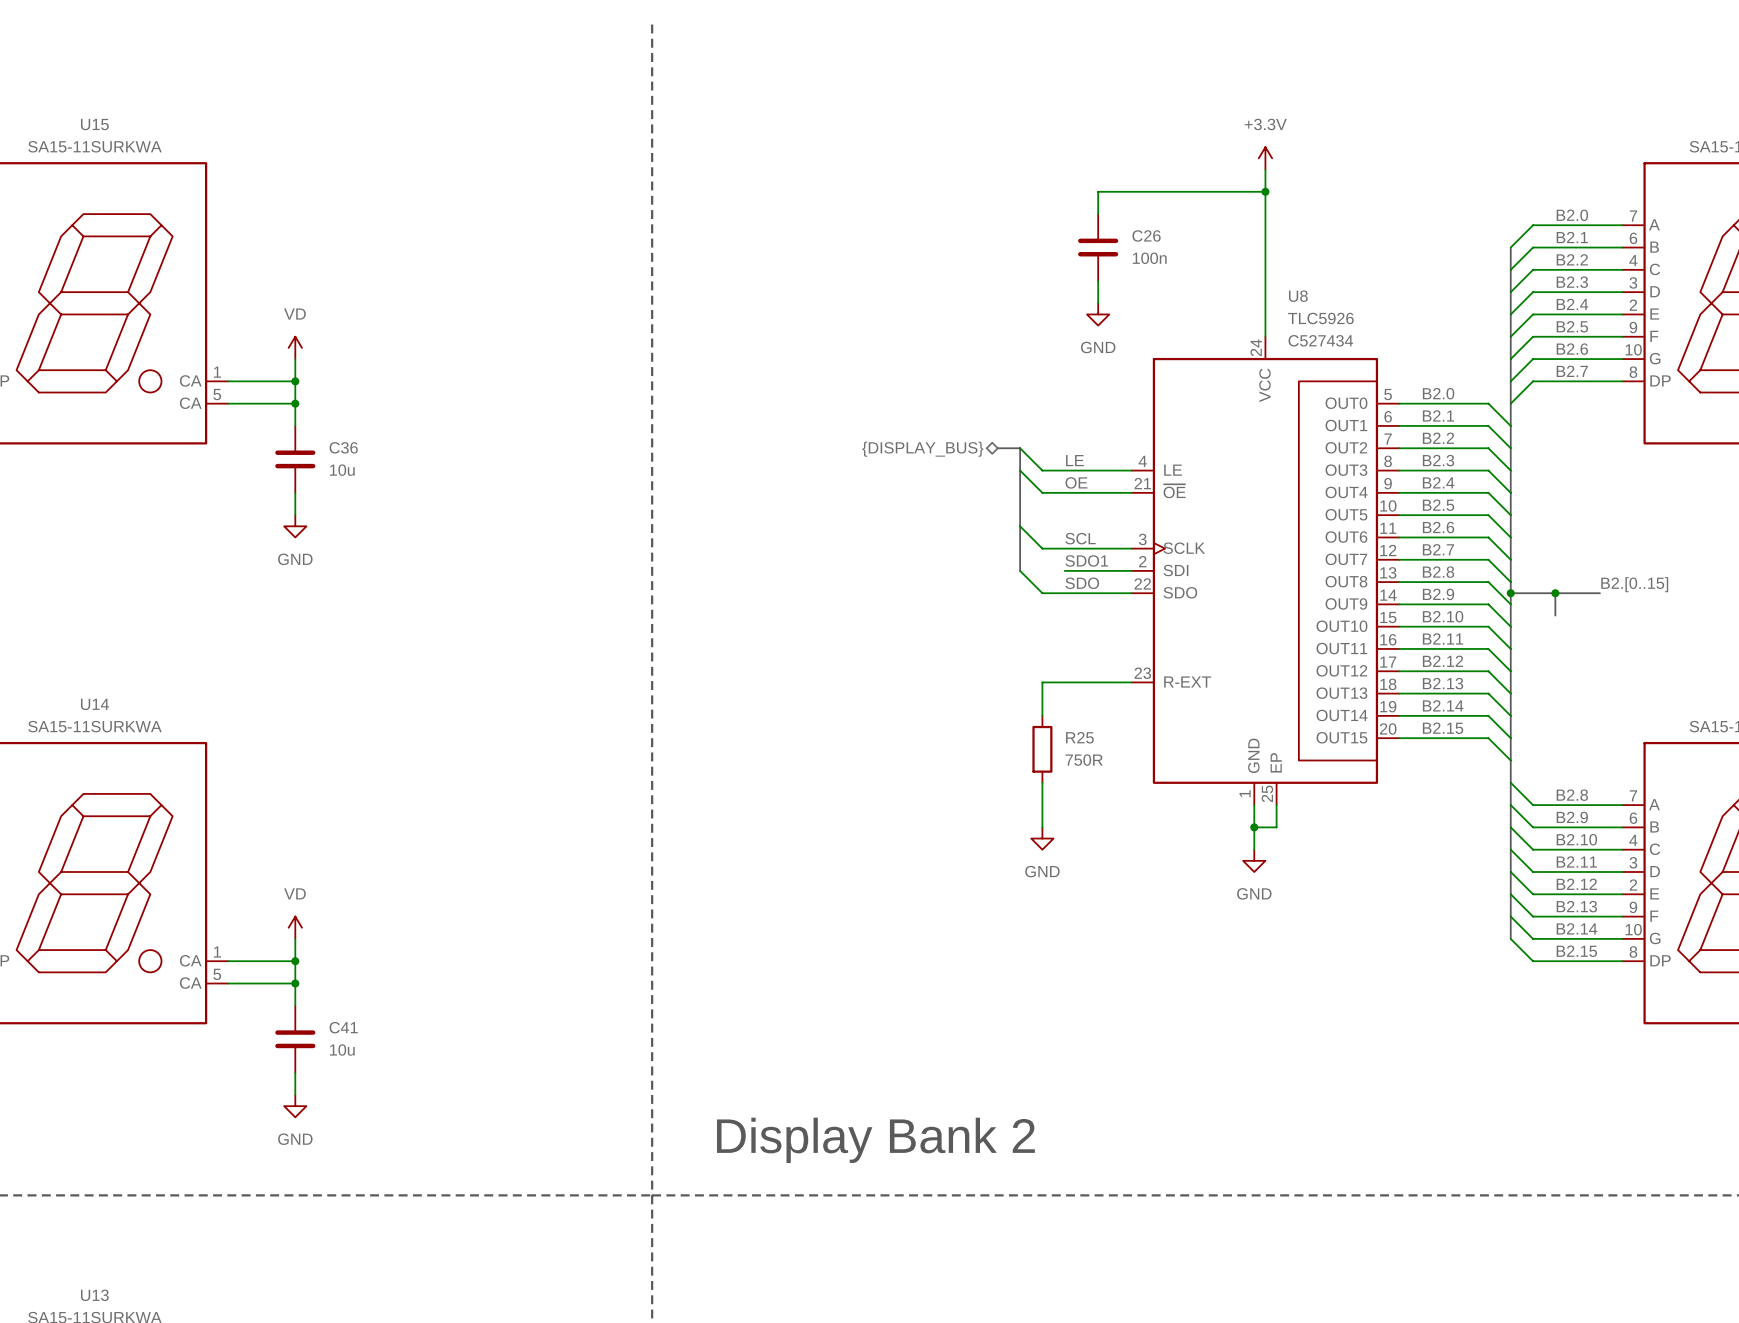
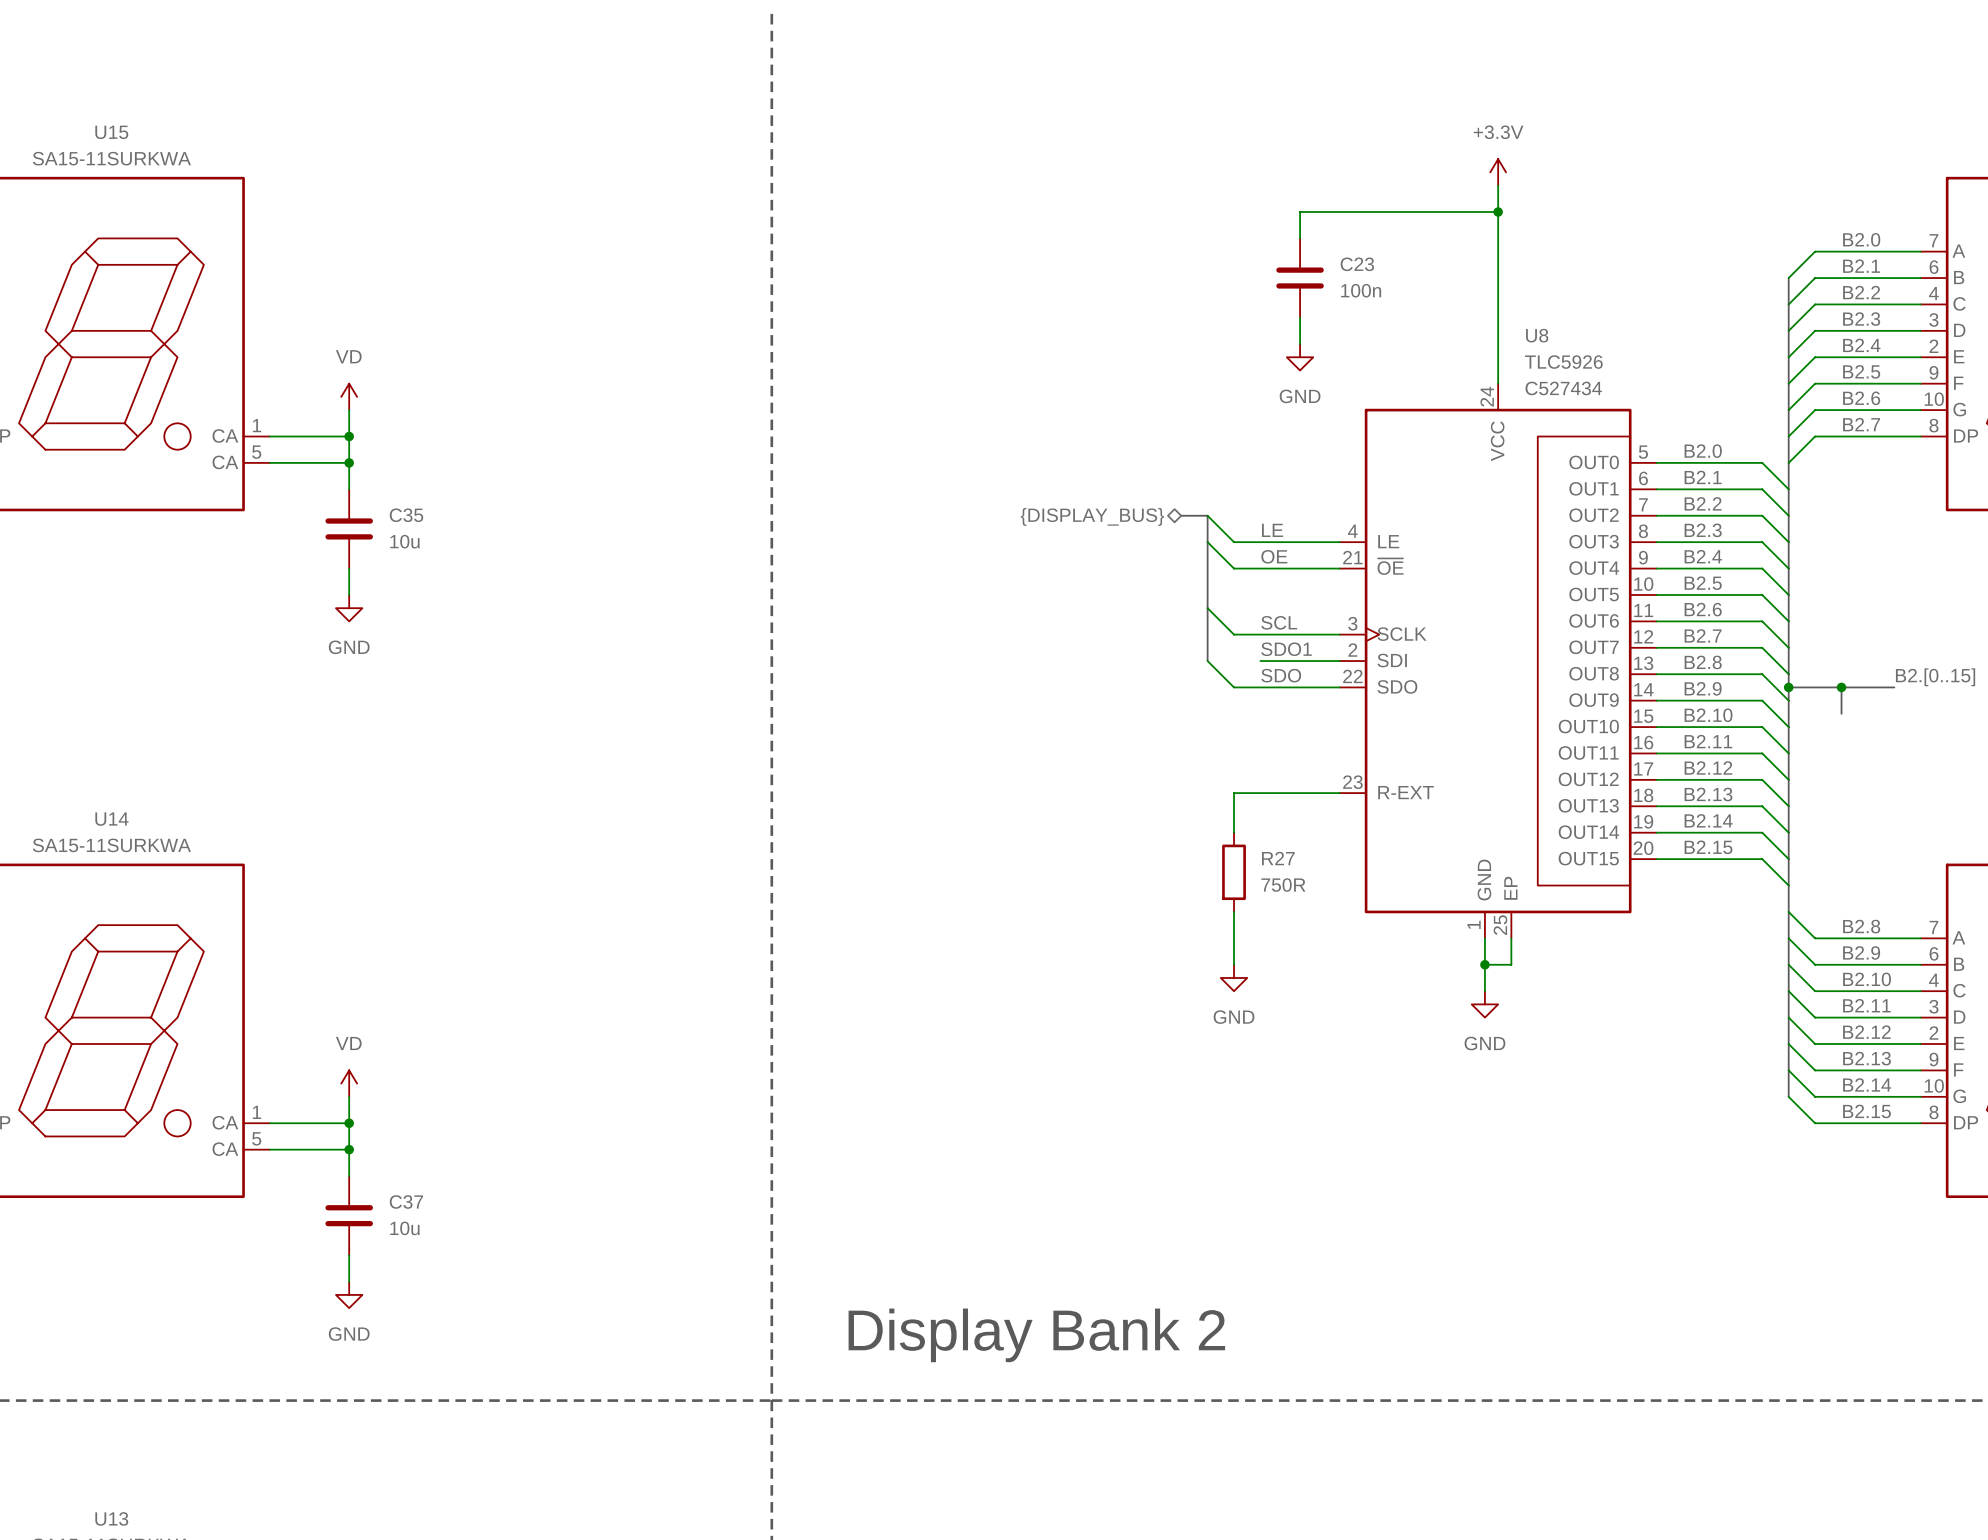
C26 name: C26 (1146, 235) -> C23 (1357, 264)
C36 name: C36 (343, 447) -> C35 (406, 515)
R25 name: R25 (1079, 737) -> R27 (1278, 858)
C41 name: C41 (343, 1027) -> C37 (406, 1201)

